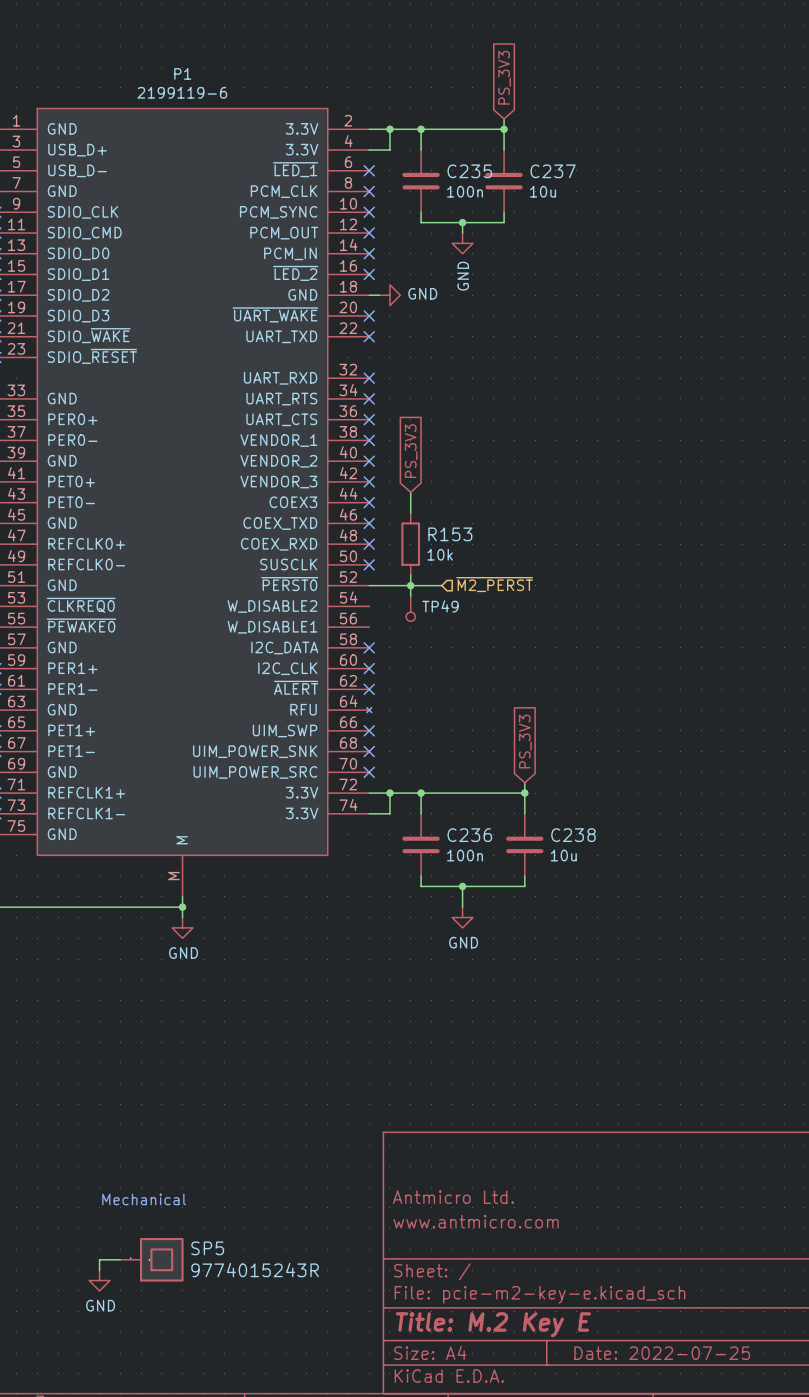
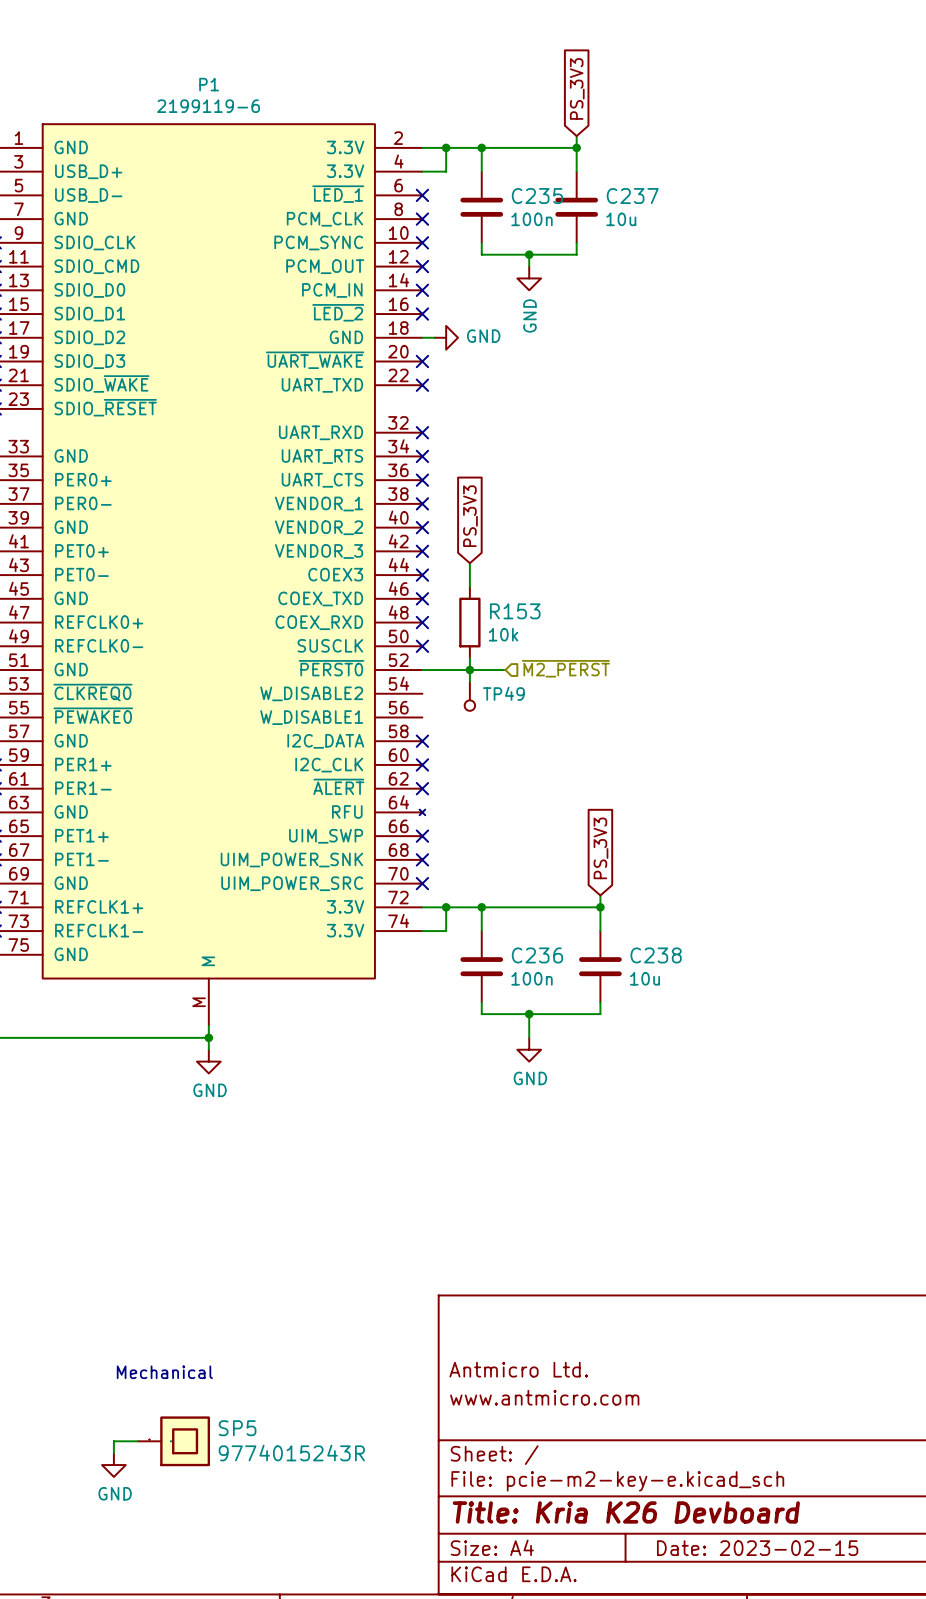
title block: Title: M.2 Key E (493, 1324) -> Title: Kria K26 Devboard (626, 1512)
title block: Date: 2022-07-25 (662, 1353) -> Date: 2023-02-15 (757, 1548)

